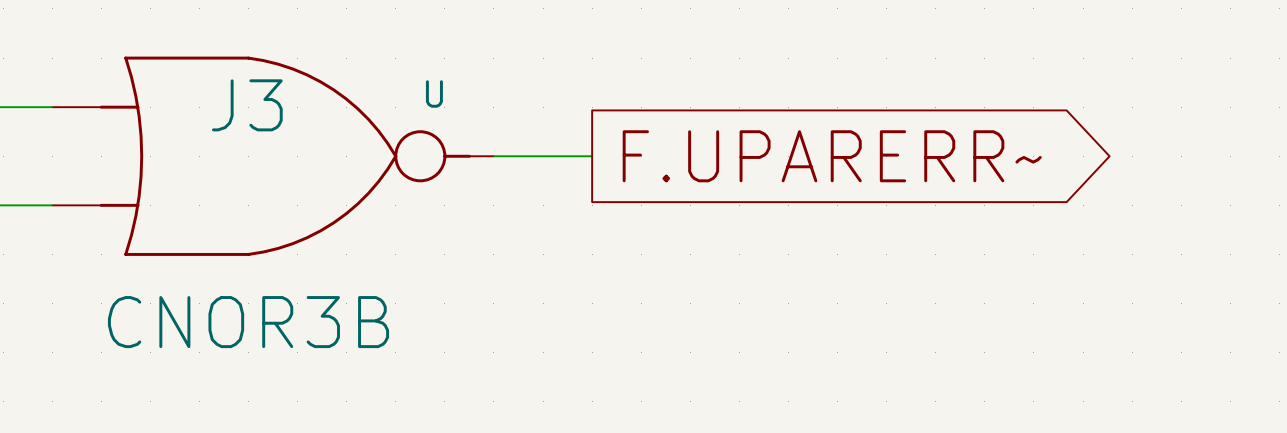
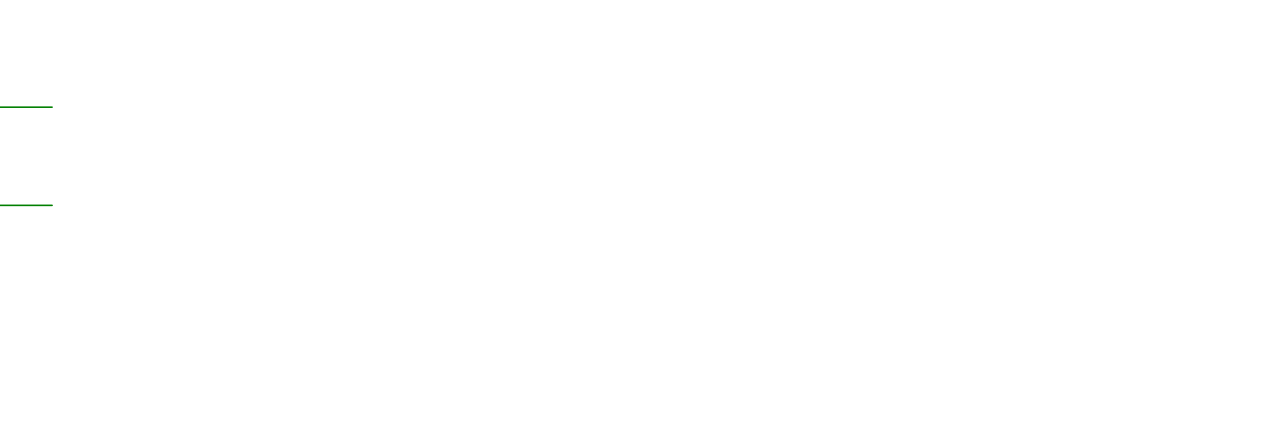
U: (273, 156) -> none
wire: (493, 156) (592, 156) -> none
global label: F.UPARERR~ (832, 156) -> none

